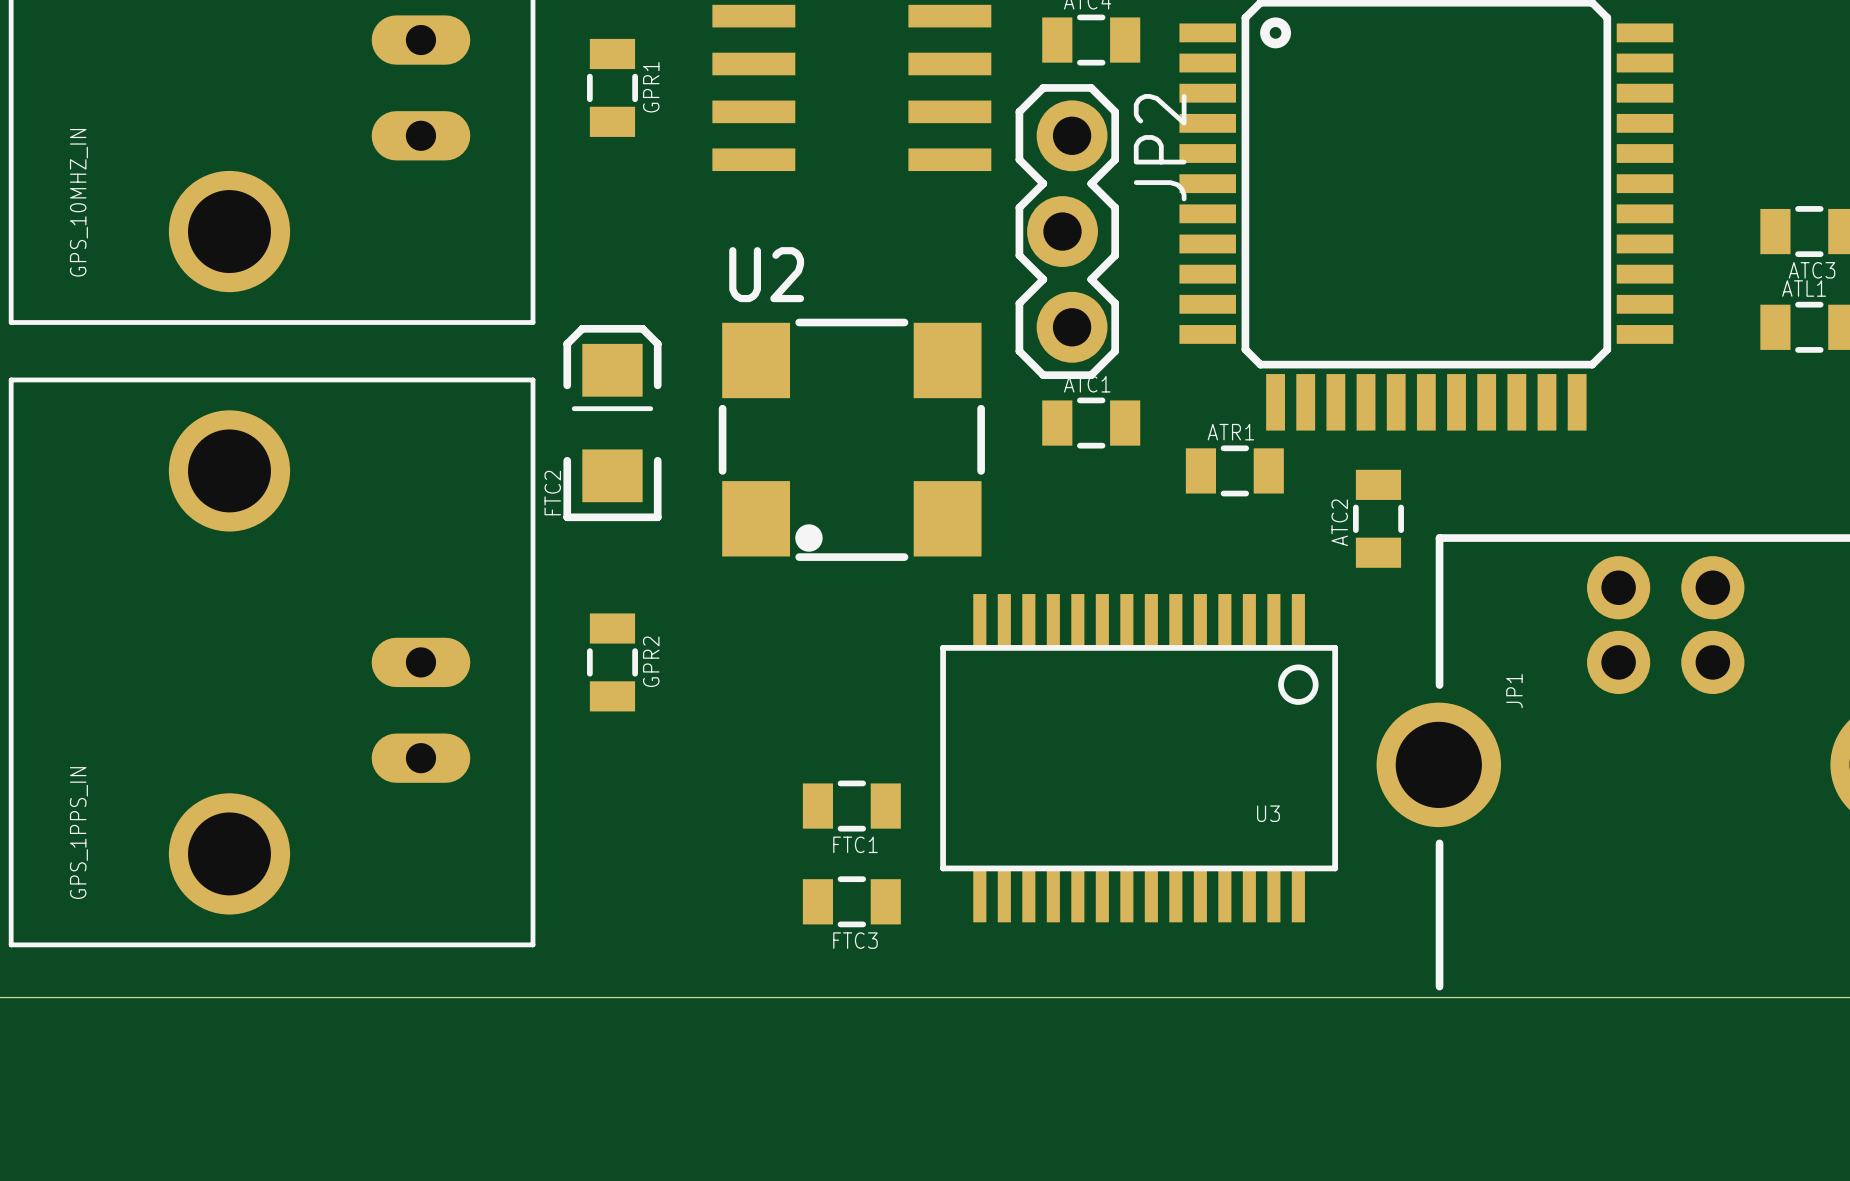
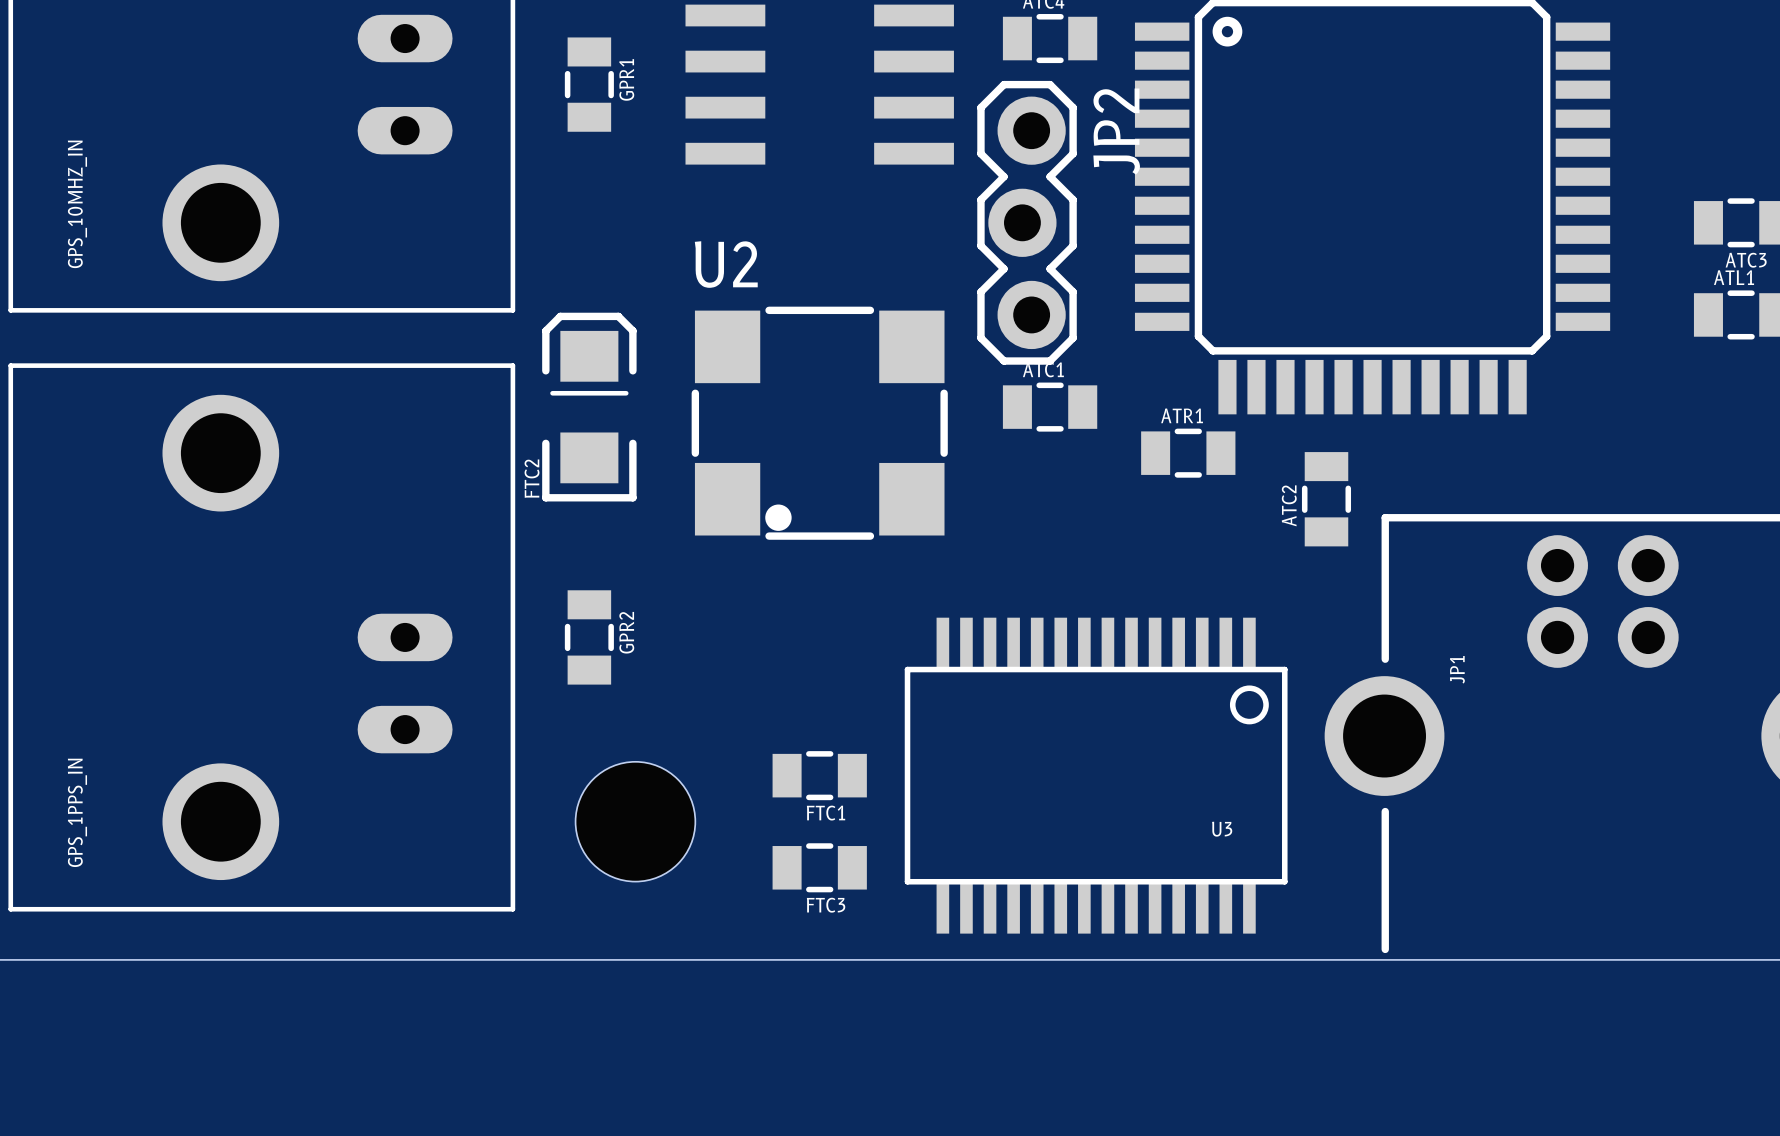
U3 position: (1139, 758) -> (1096, 775)
part: none -> (635, 821)

